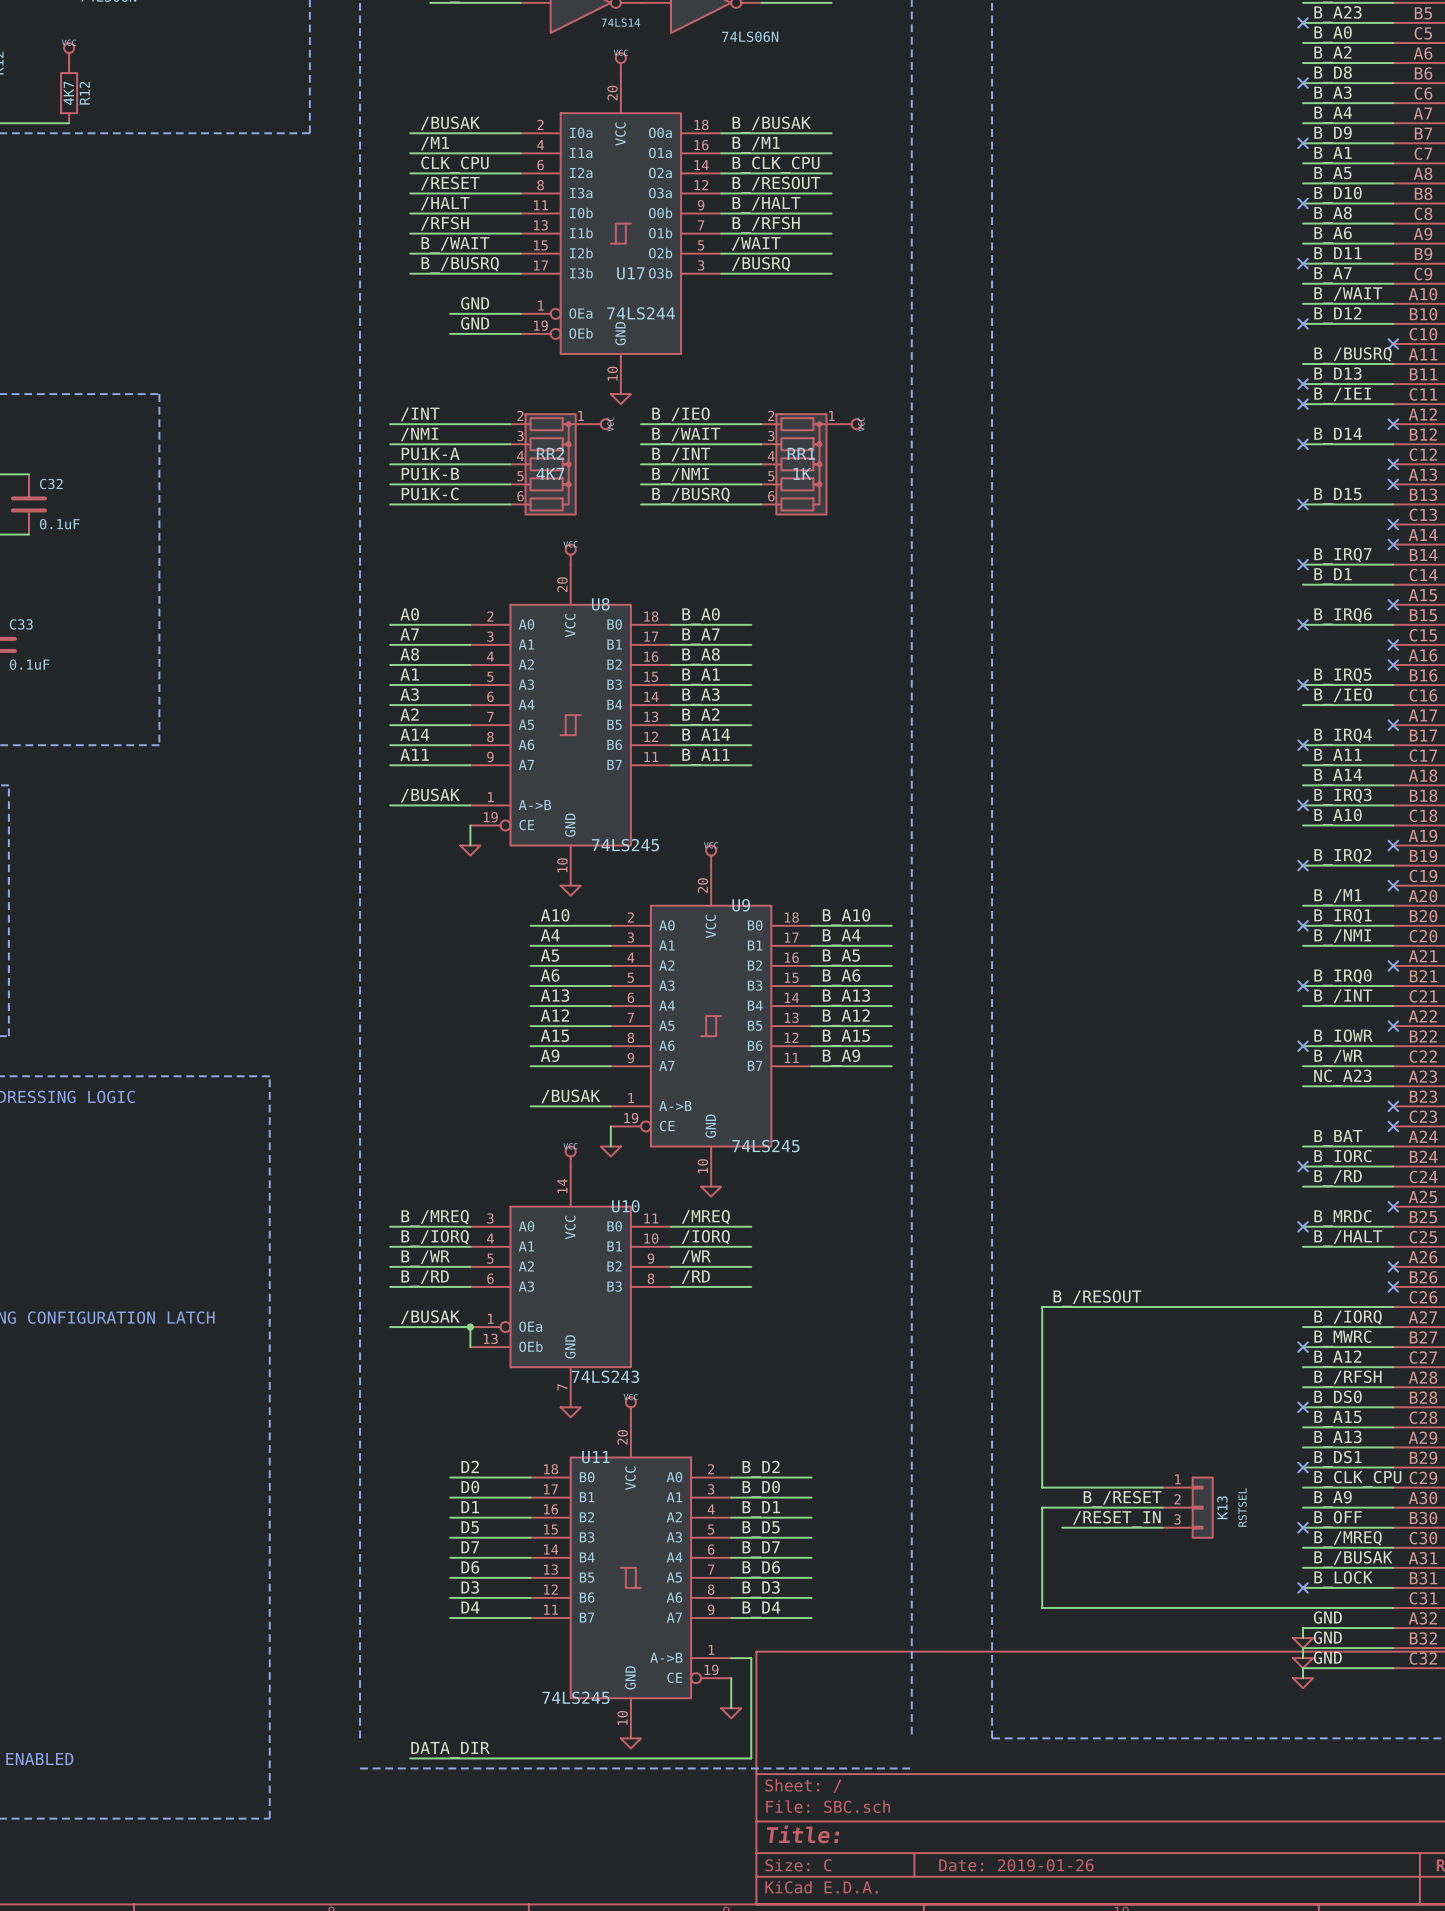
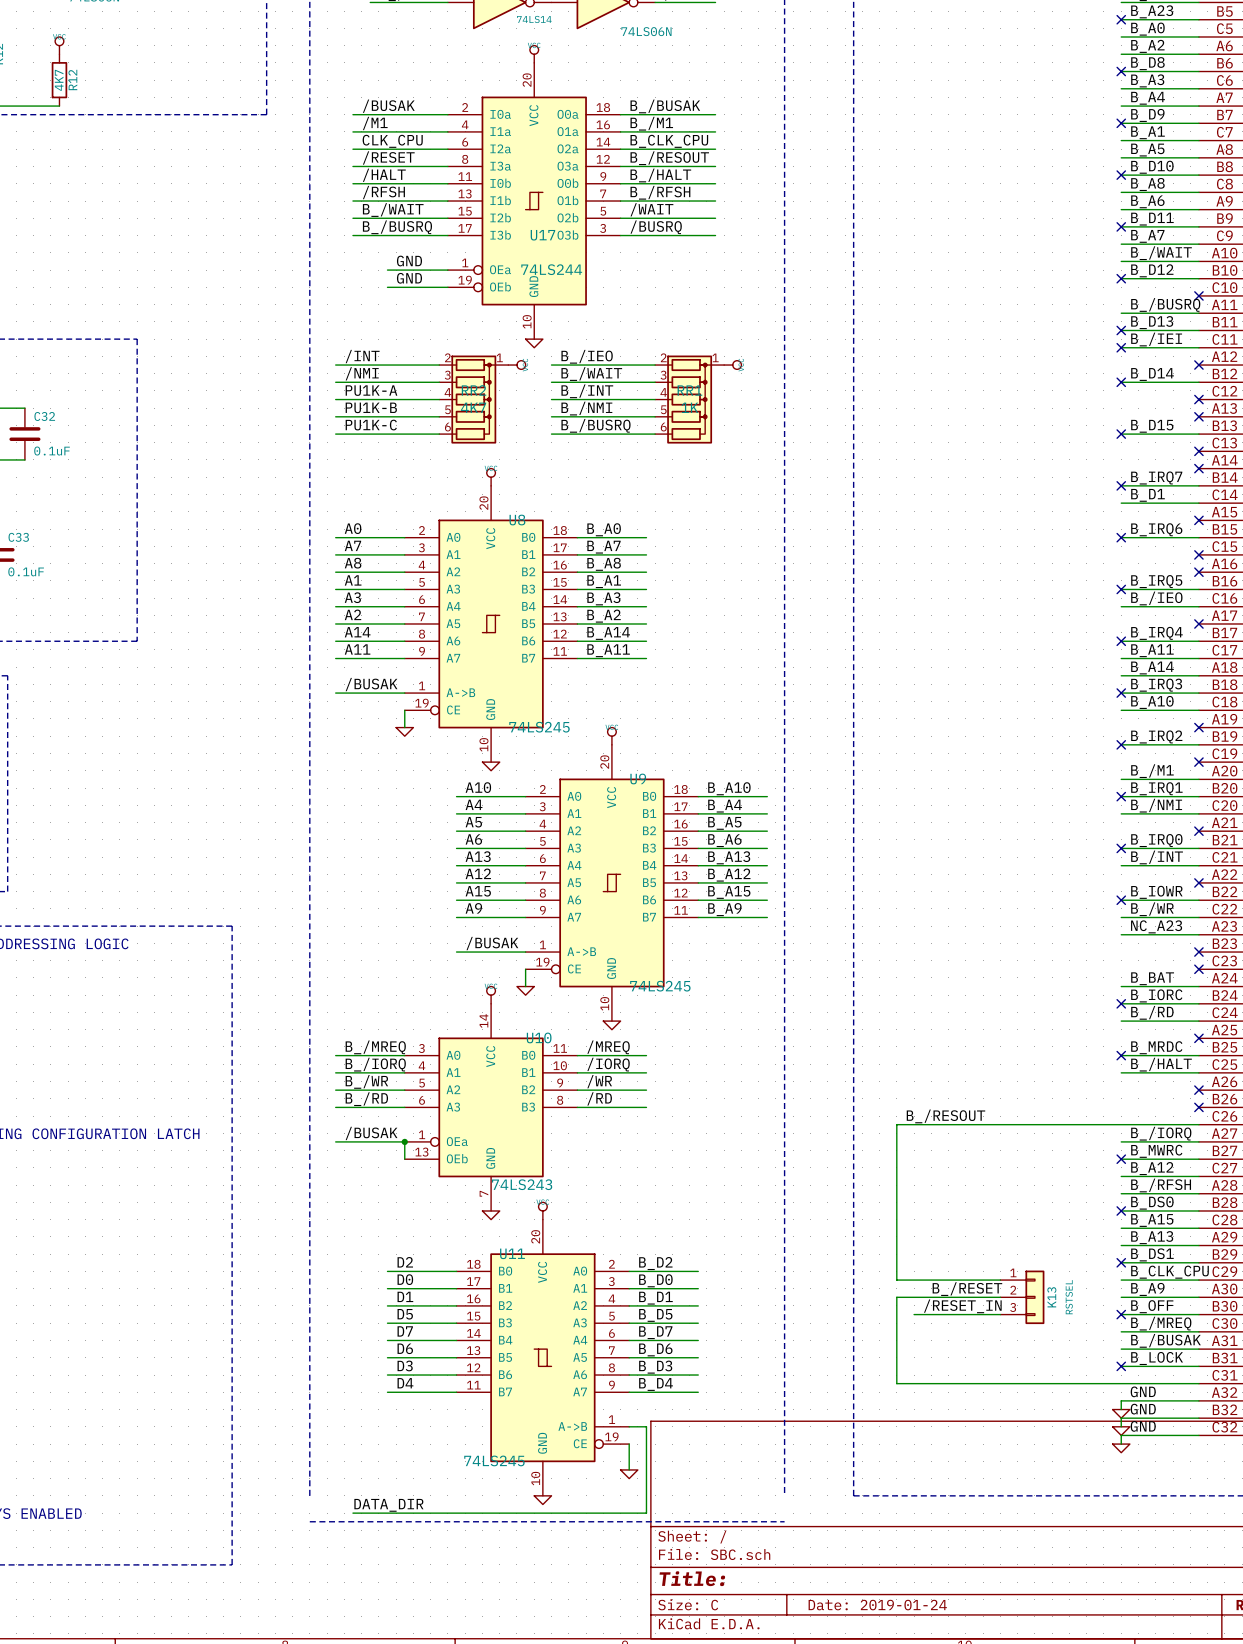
title block: Date: 2019-01-26 (1016, 1865) -> Date: 2019-01-24 (877, 1605)

